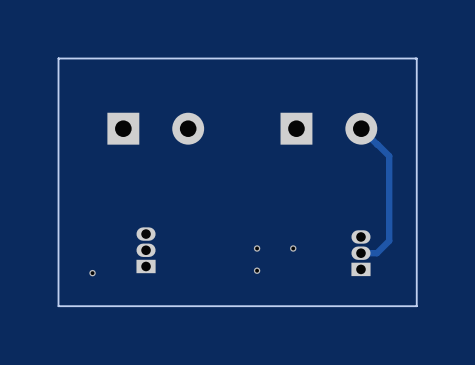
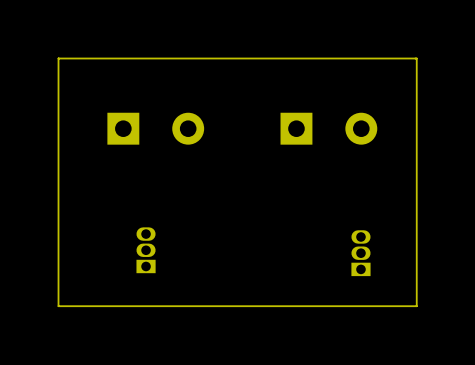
track: (361, 128) (389, 156) (389, 240) (376, 253) (360, 253) -> none
via: (257, 248) -> none
via: (293, 248) -> none
via: (257, 270) -> none
via: (92, 273) -> none

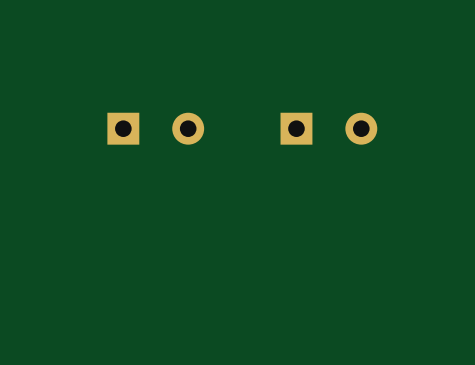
board edge: (416, 58) (58, 58) (58, 306) (416, 306) (416, 58) -> none
part: (146, 250) -> none
part: (360, 253) -> none

